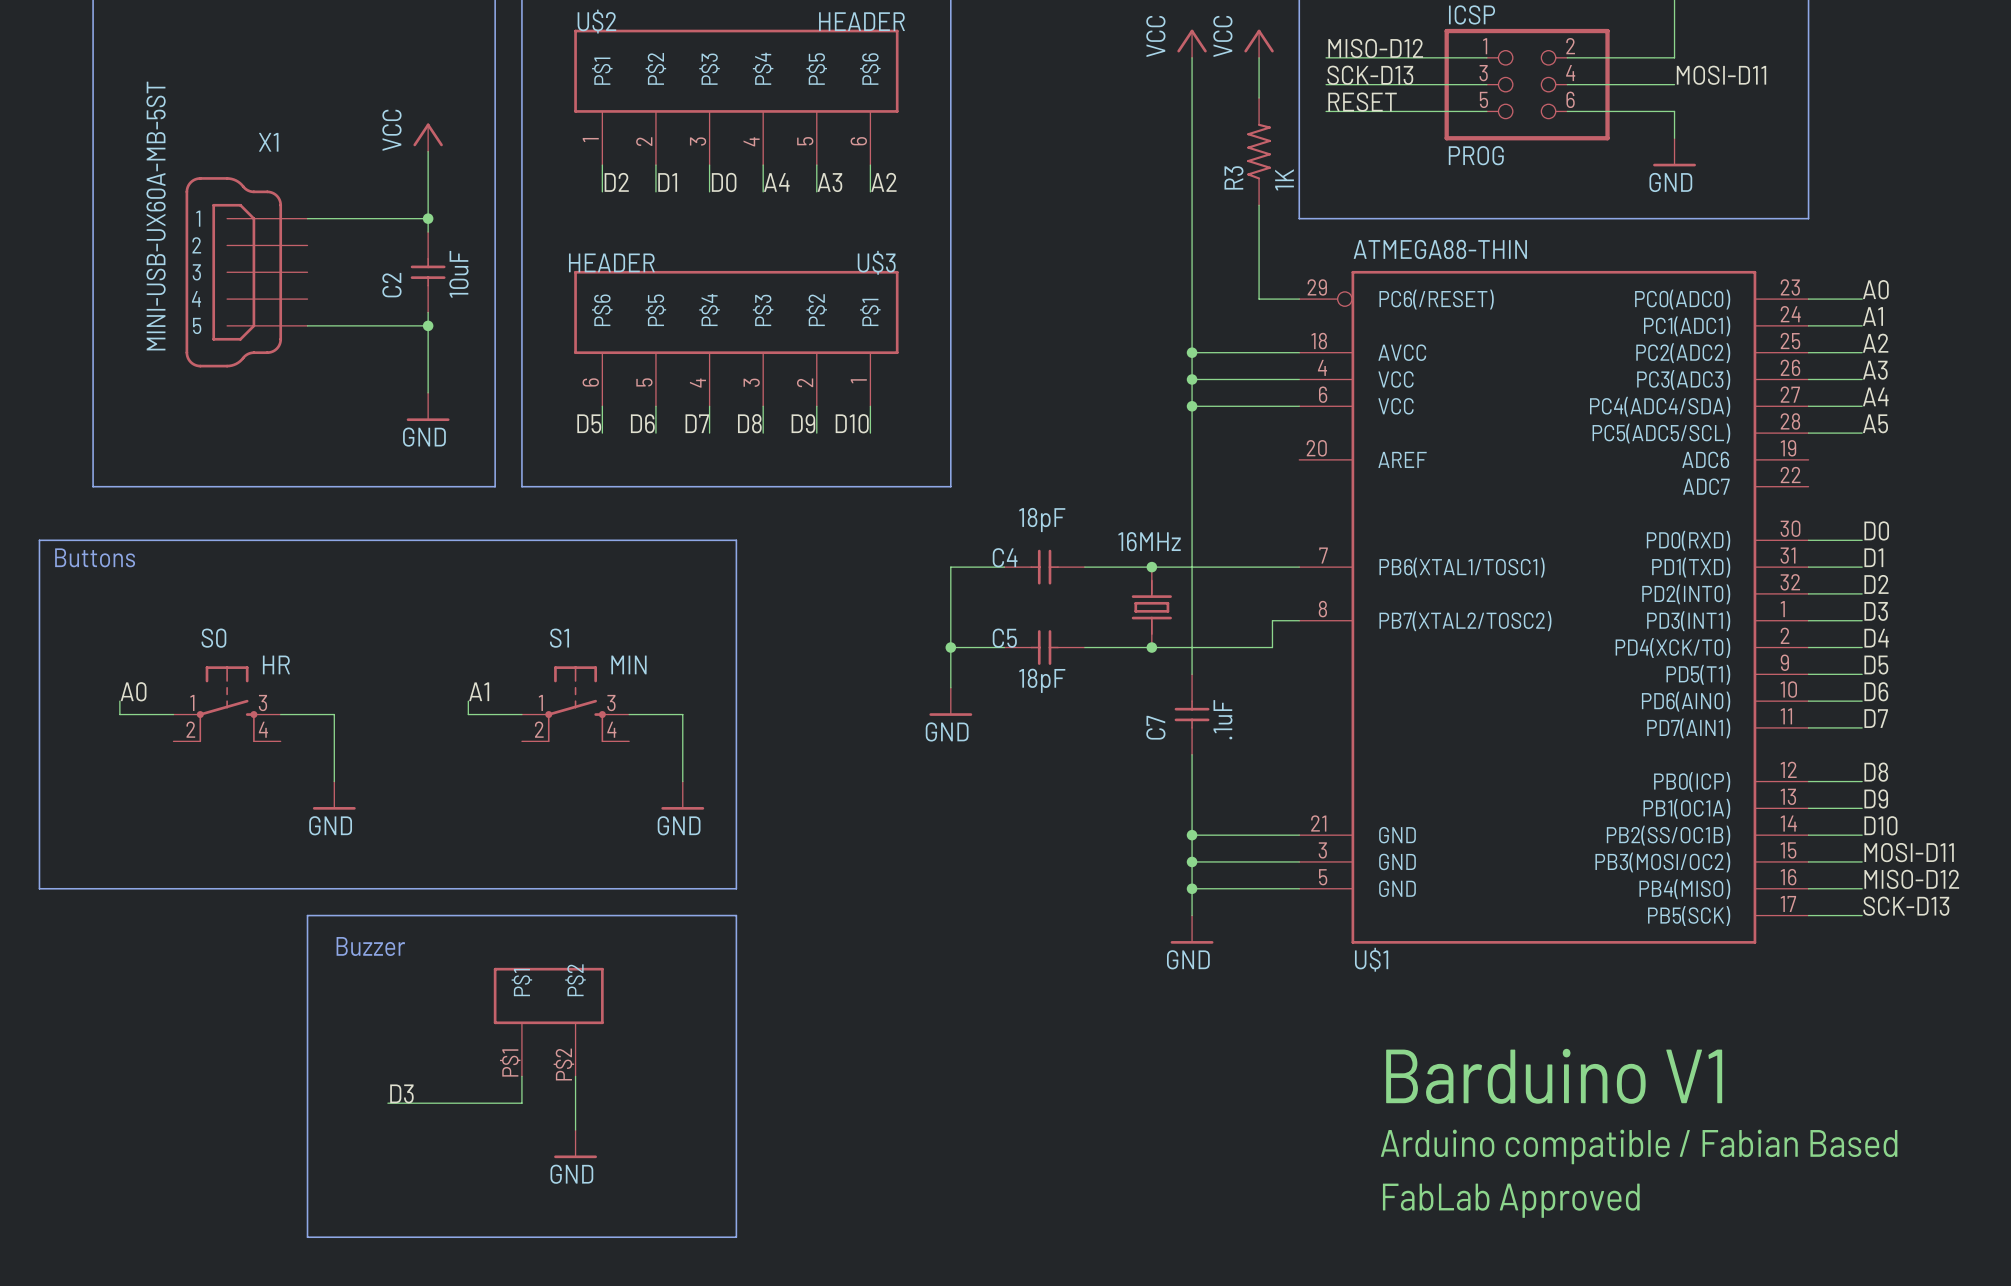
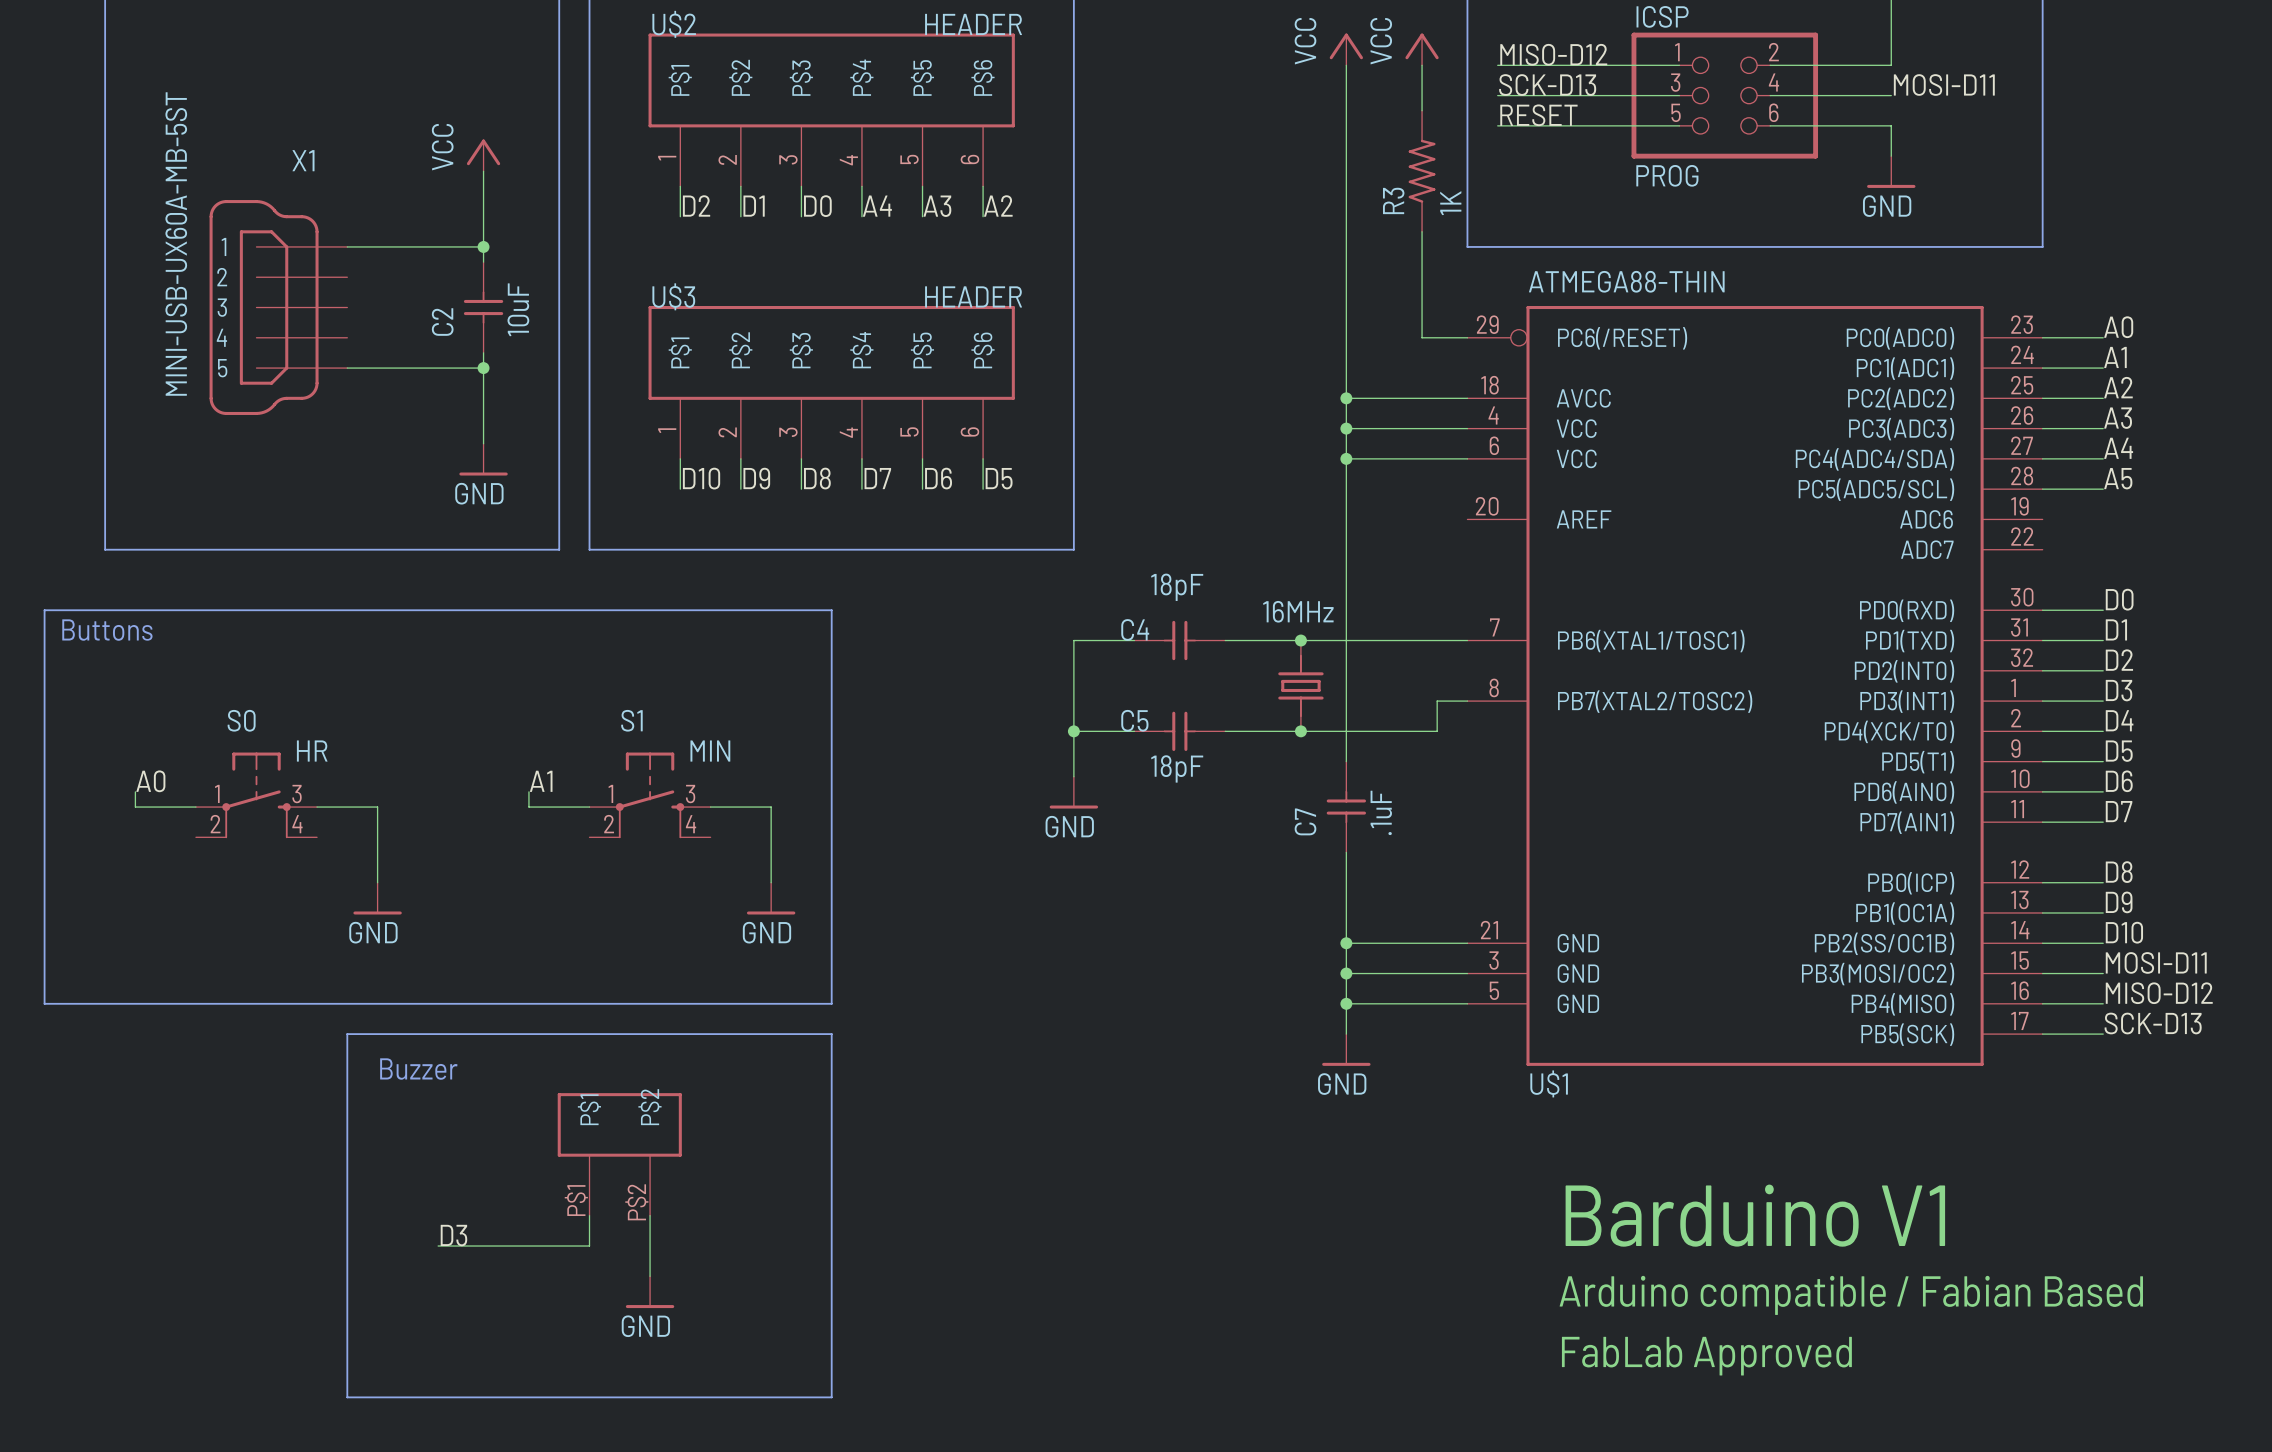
U$3 flip: as is (736, 312) -> left-right (831, 352)
label: D5 (589, 423) -> D10 (701, 478)
label: D6 (642, 423) -> D9 (756, 478)
label: D7 (697, 423) -> D8 (817, 478)
label: D8 (749, 423) -> D7 (877, 478)
label: D9 (803, 423) -> D6 (938, 478)
label: D10 (852, 423) -> D5 (999, 478)

